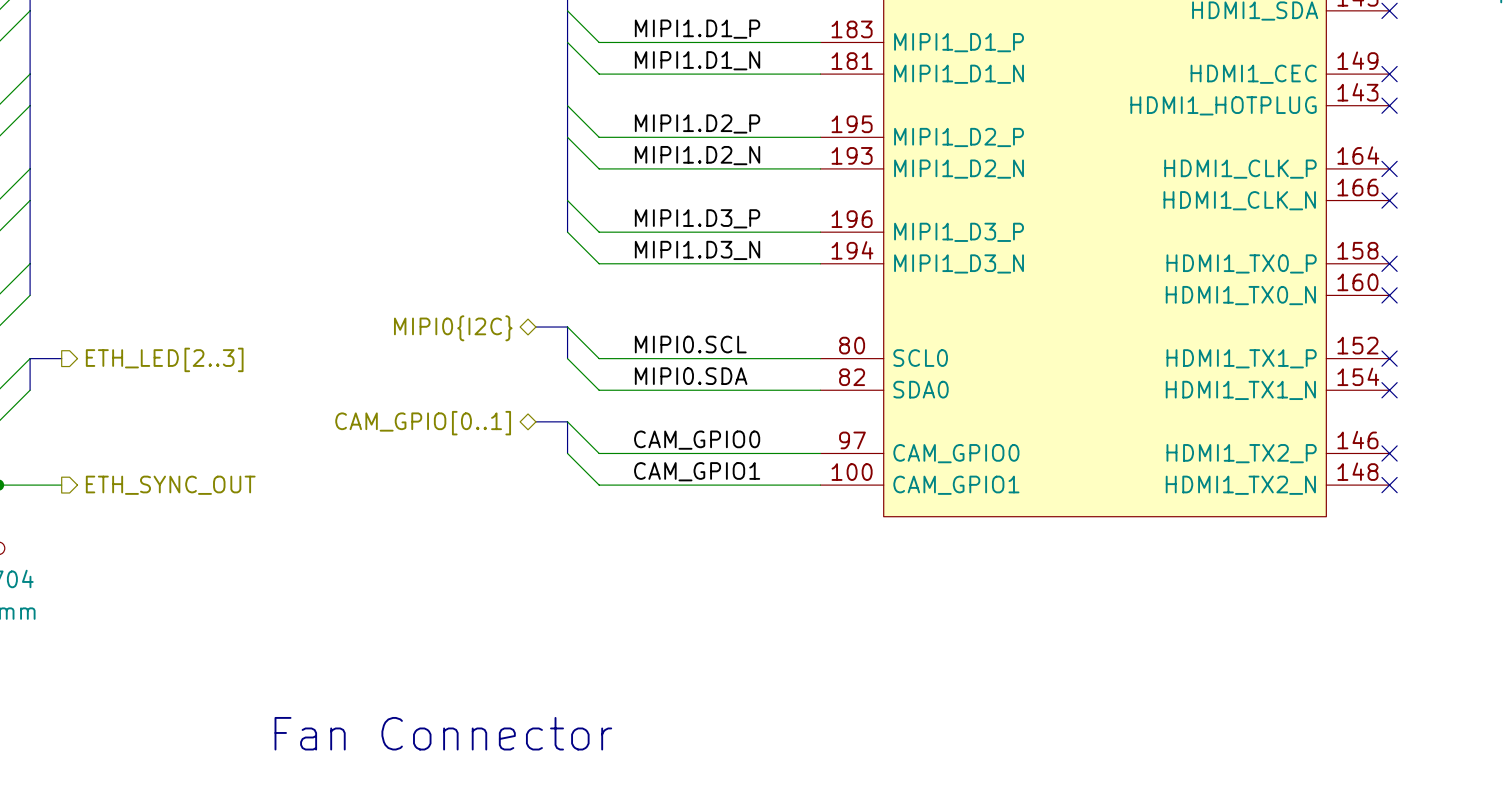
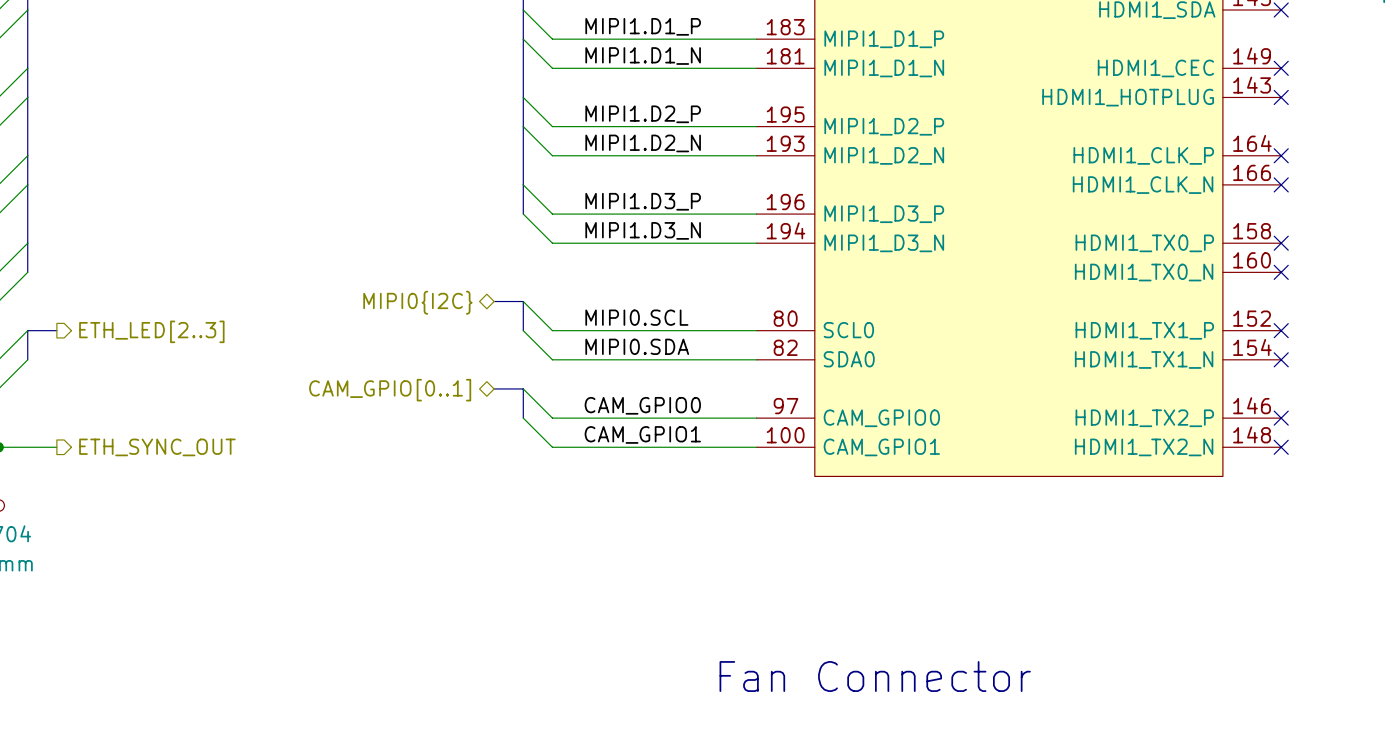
text: Fan Connector (443, 733) -> none
text: none -> Fan Connector (875, 676)

